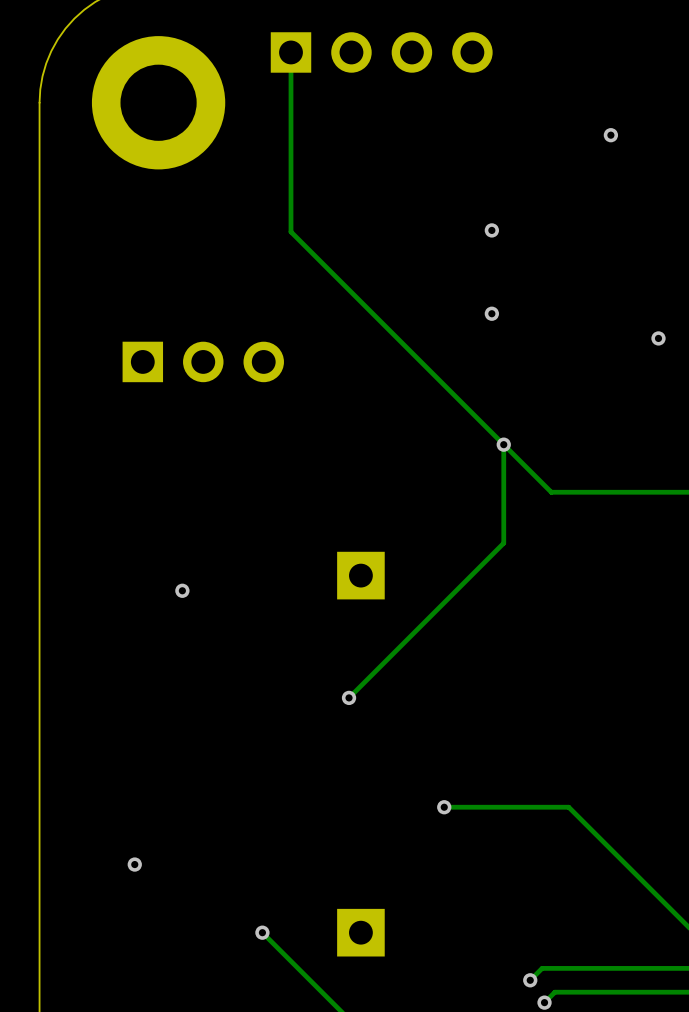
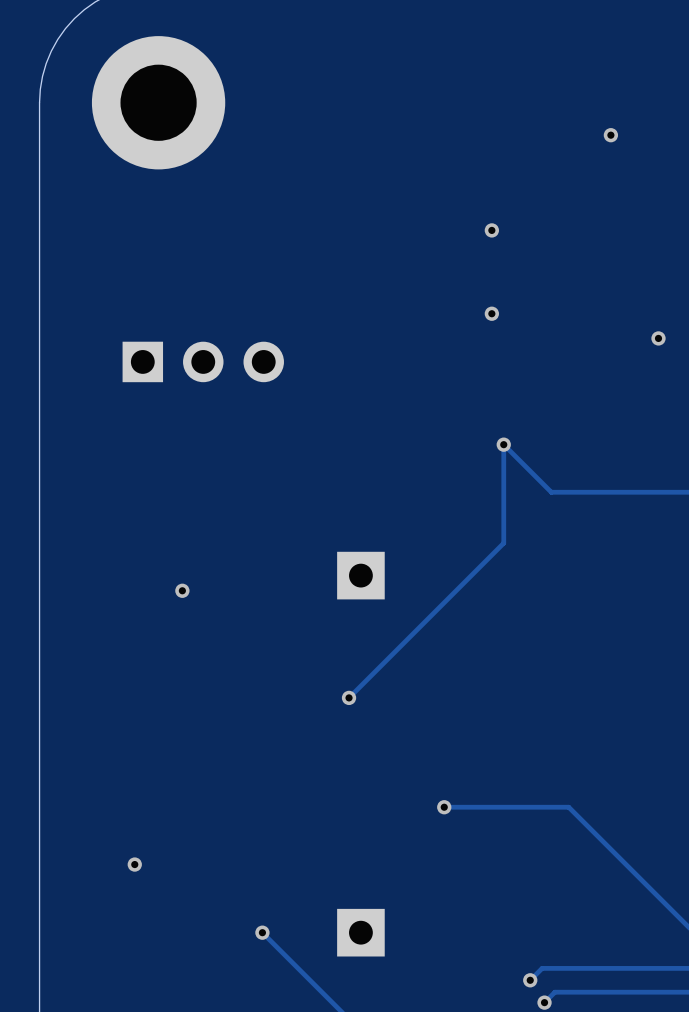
track: (290, 52) (290, 231) (503, 444) -> none
part: (381, 52) -> none

